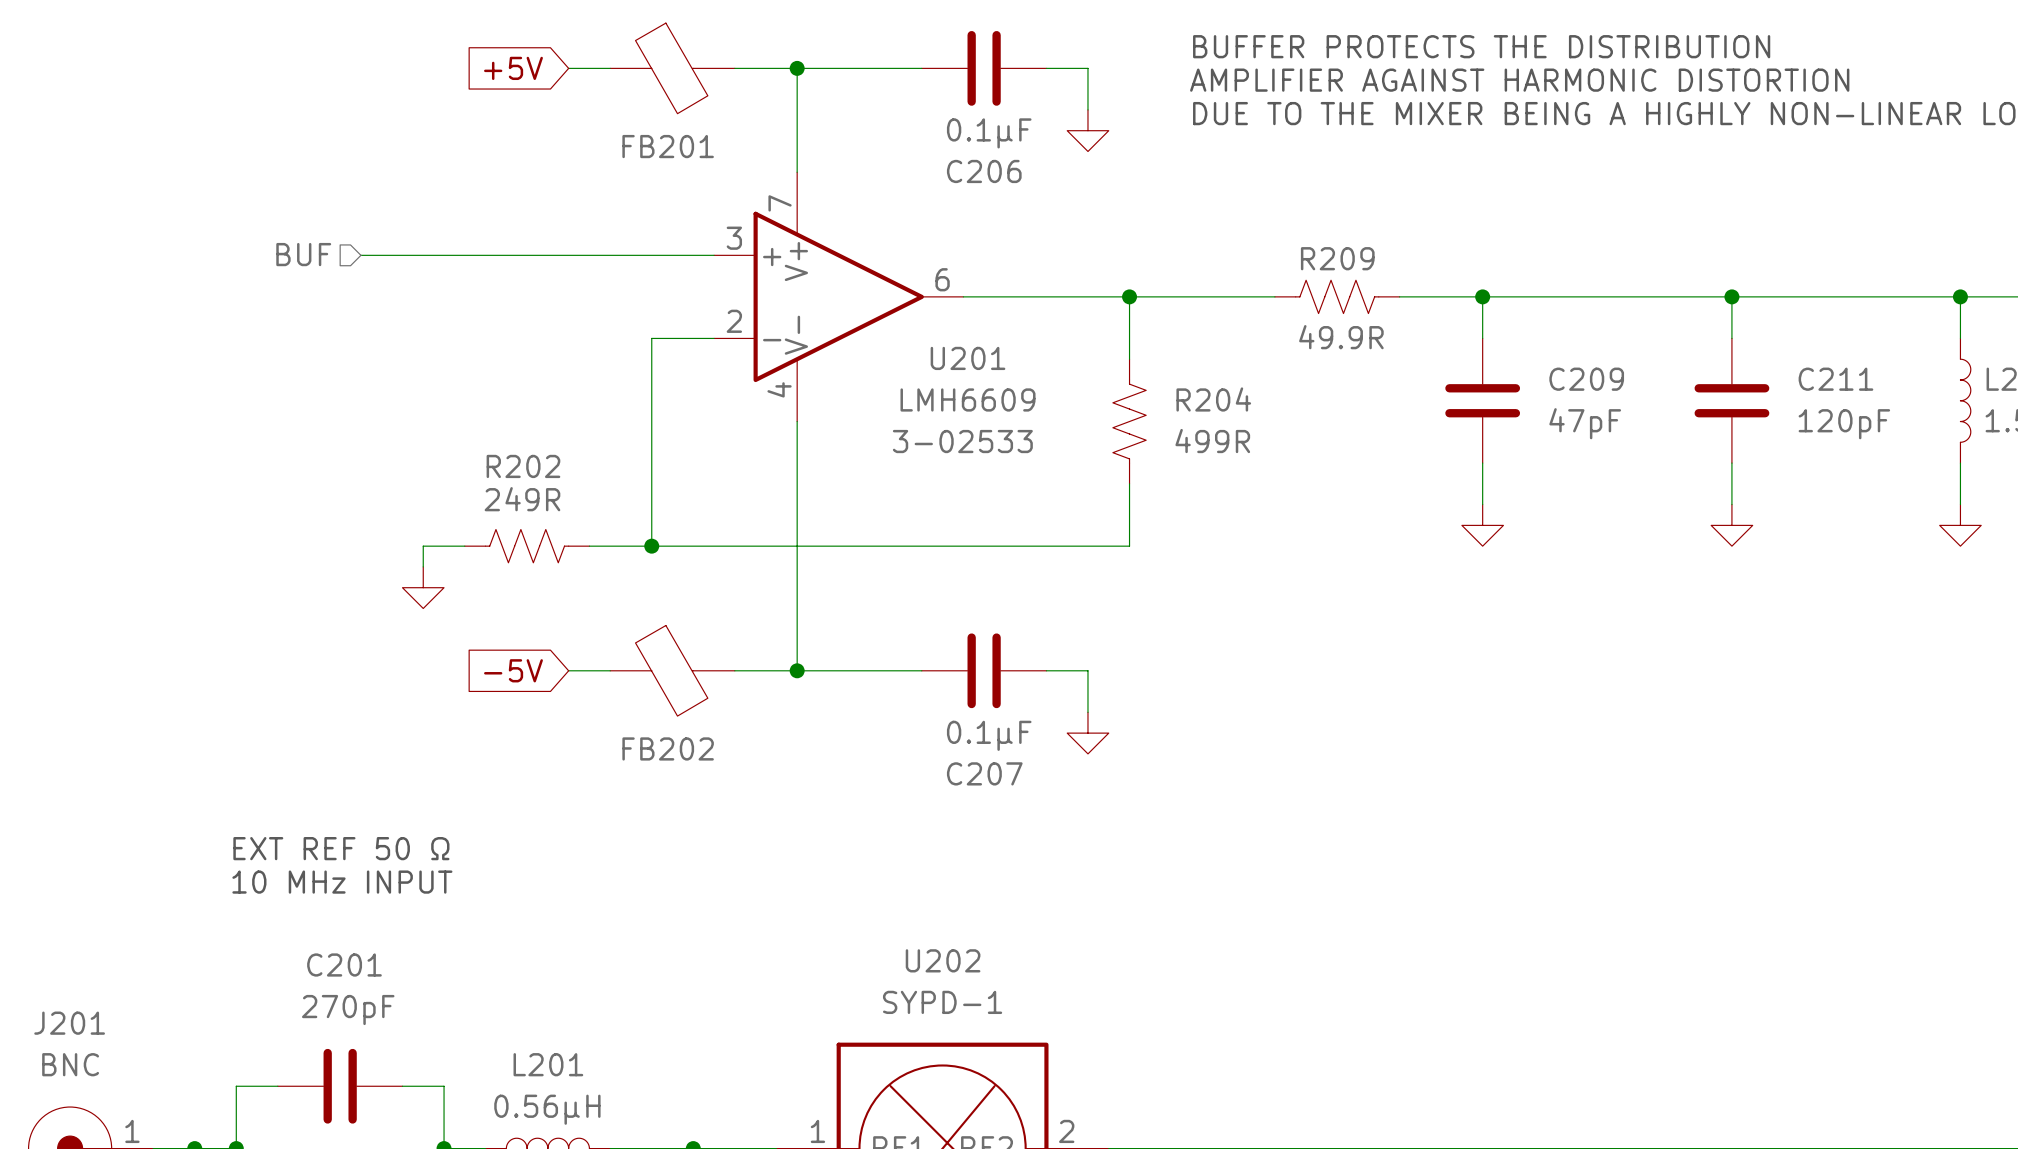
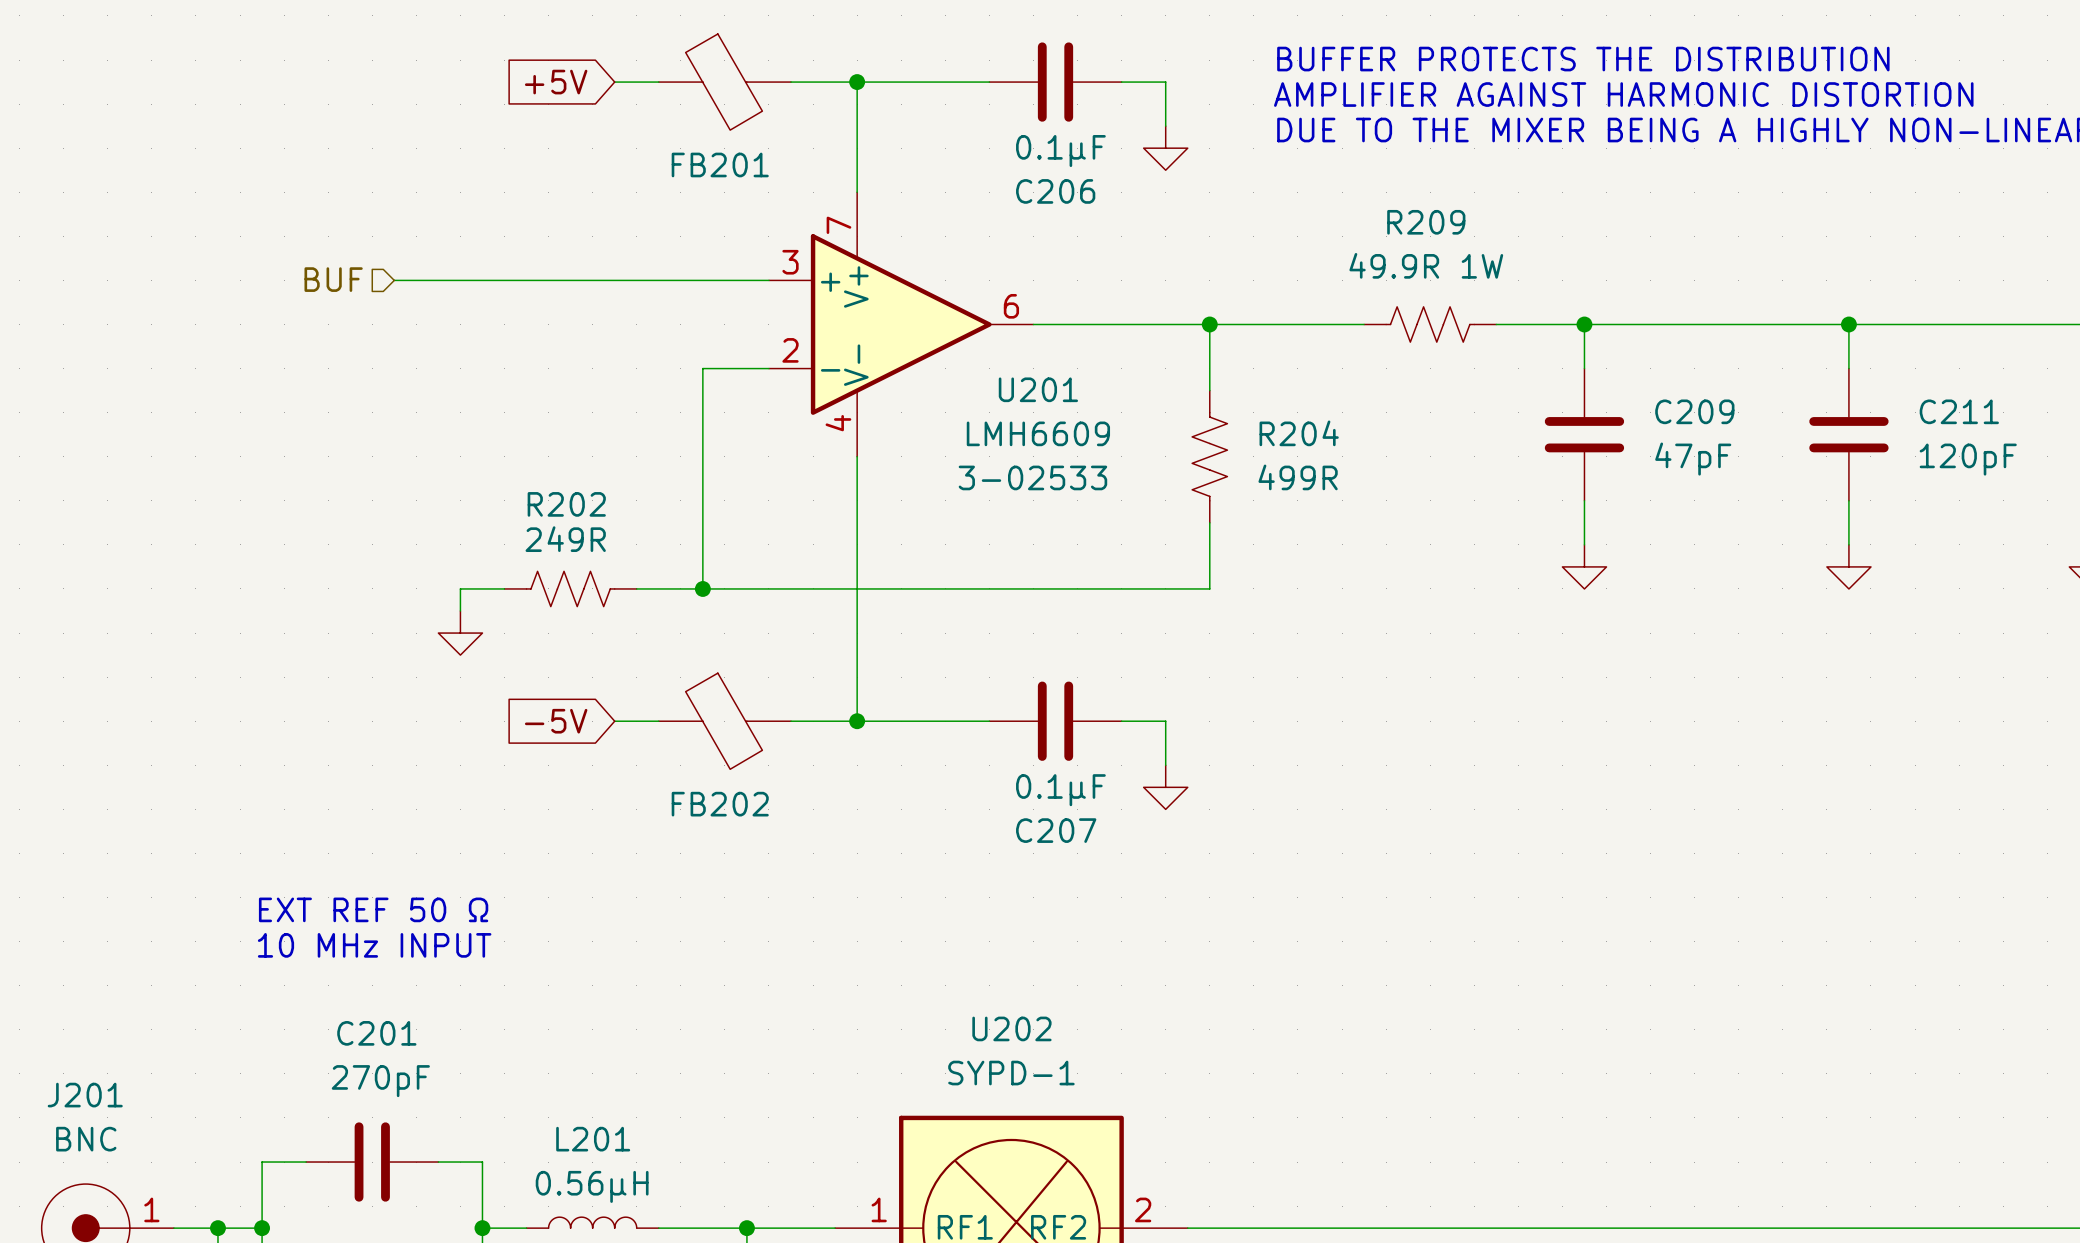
R209 name position: R209 (1337, 258) -> R209 (1426, 222)
R209 value: 49.9R (1341, 337) -> 49.9R 1W (1426, 265)

